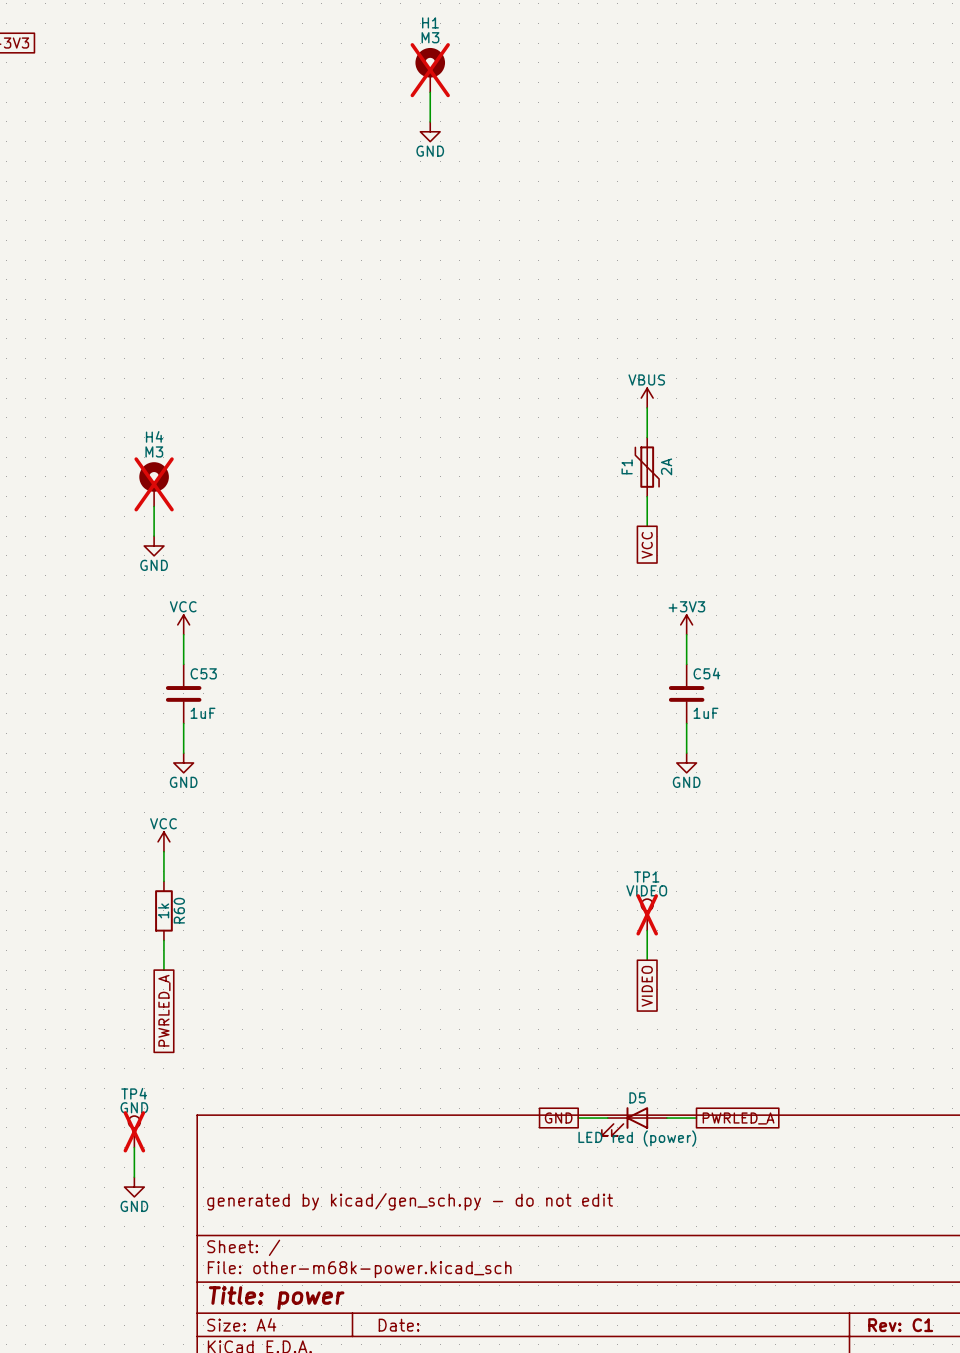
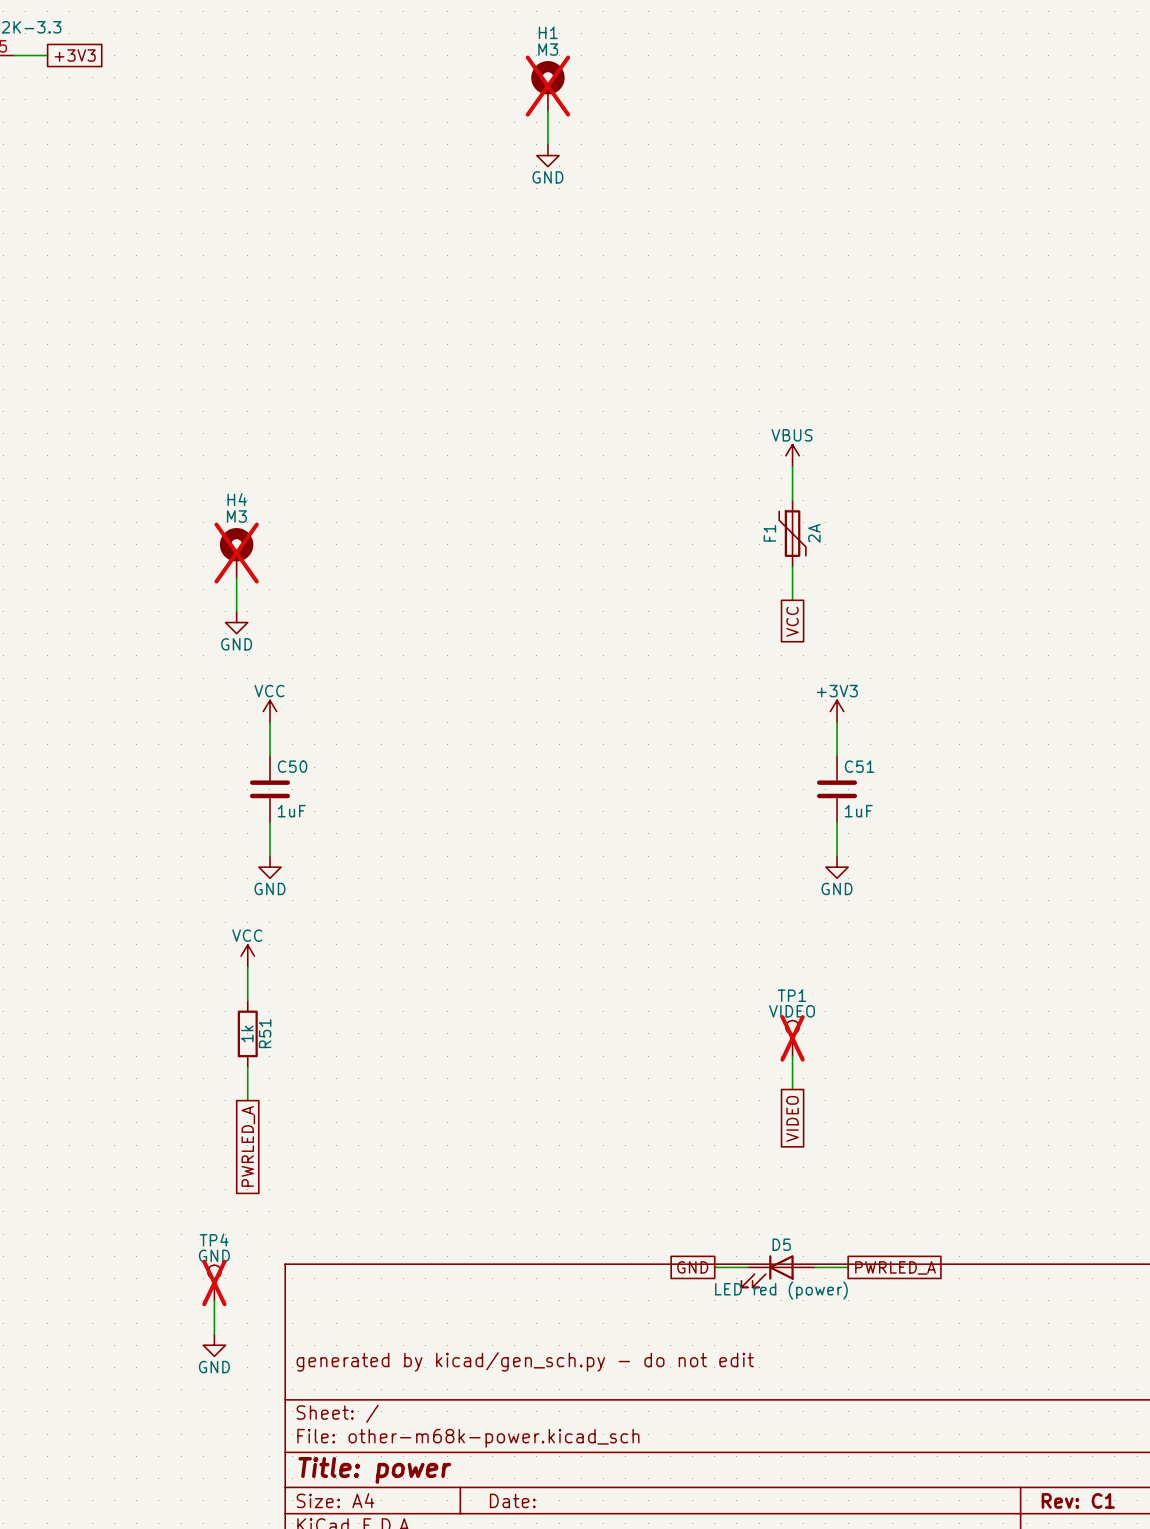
C53 name: C53 (203, 673) -> C50 (292, 766)
C54 name: C54 (706, 673) -> C51 (859, 766)
R60 name: R60 (179, 910) -> R51 (265, 1033)

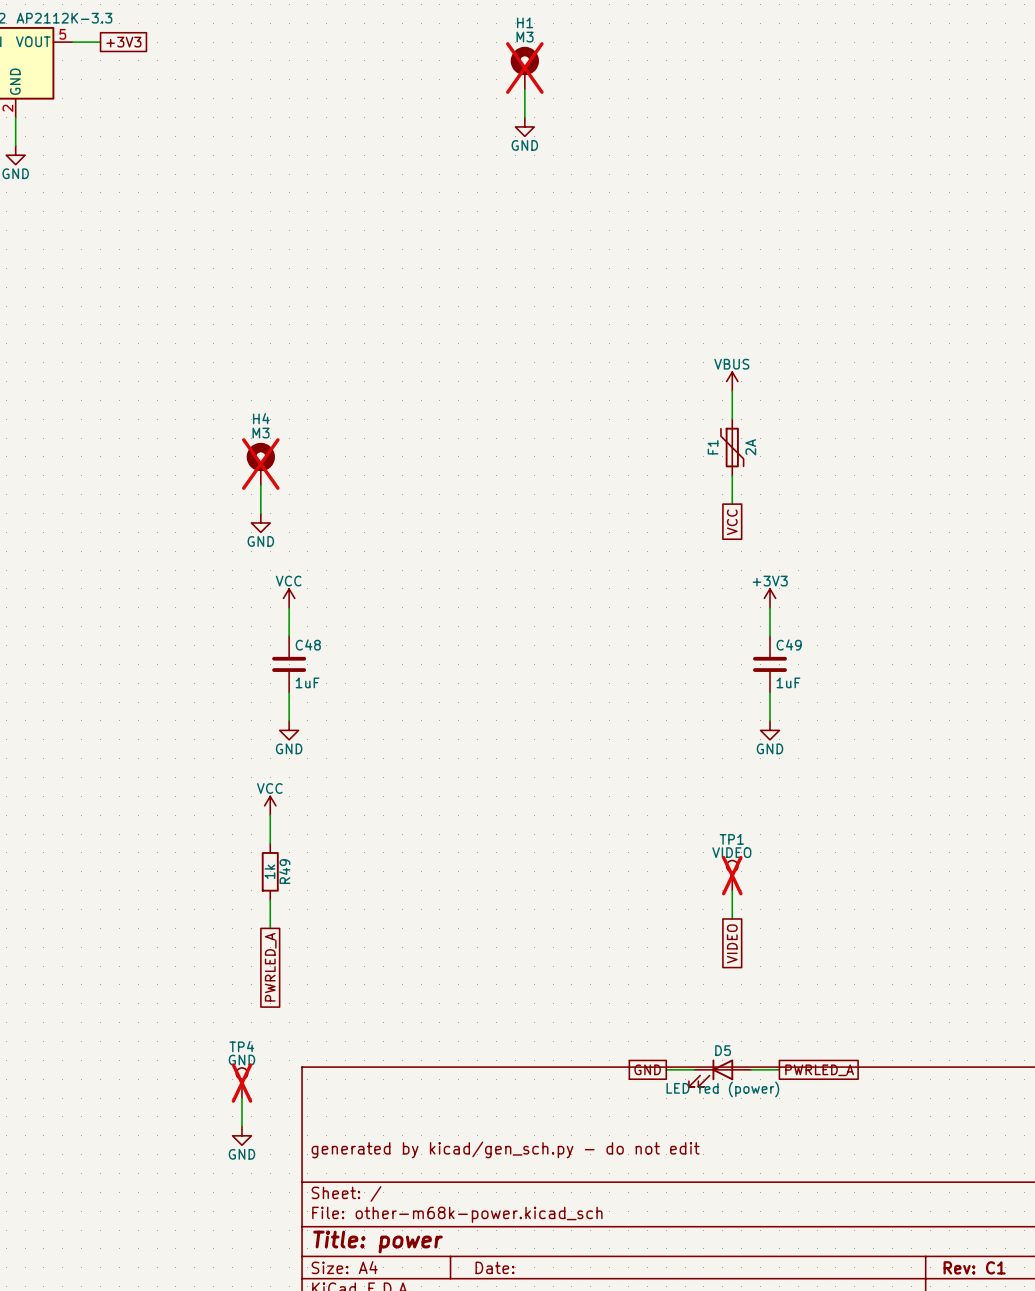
C50 name: C50 (292, 766) -> C48 (308, 644)
C51 name: C51 (859, 766) -> C49 (789, 644)
R51 name: R51 (265, 1033) -> R49 (284, 871)

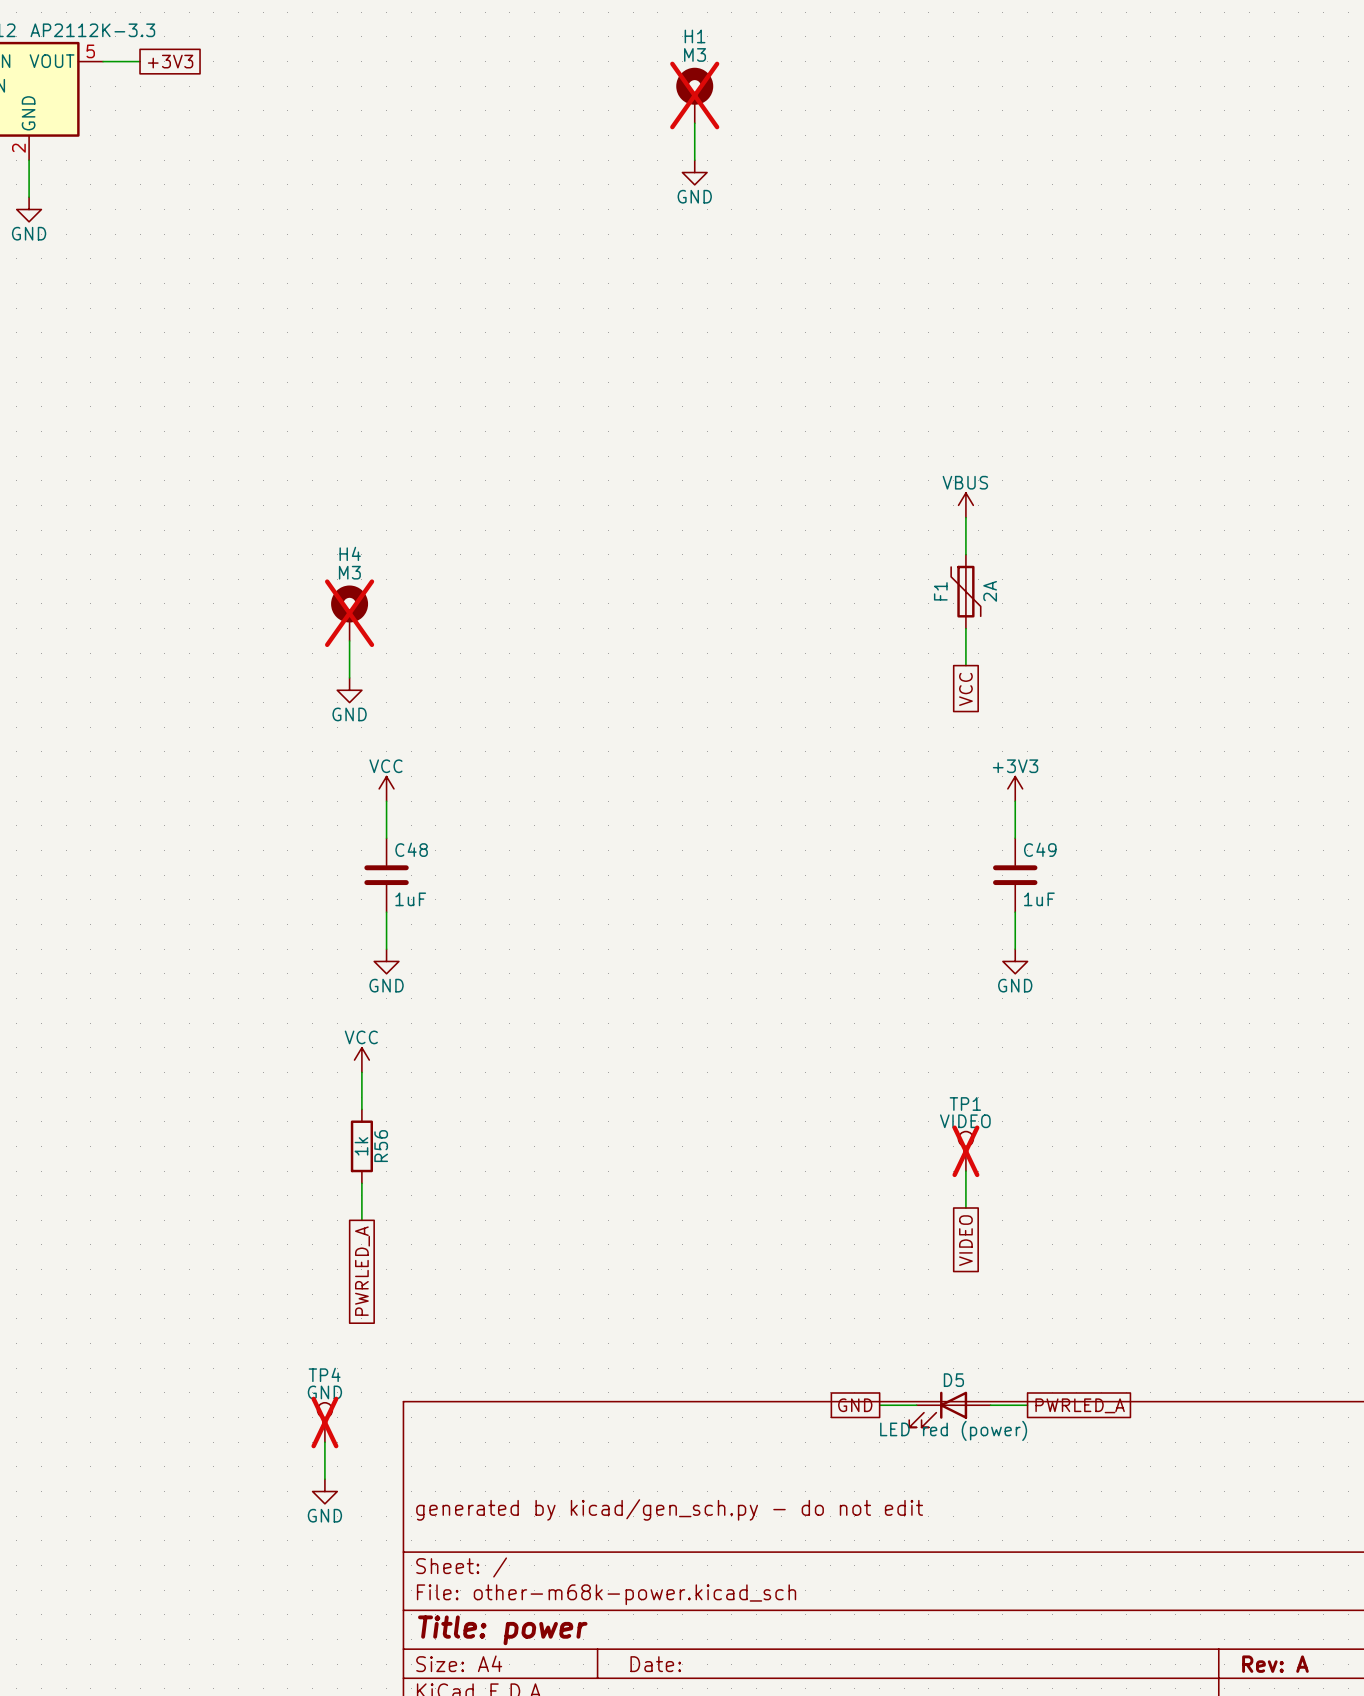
R49 name: R49 (284, 871) -> R56 (381, 1146)
title block: Rev: C1 (974, 1267) -> Rev: A (1275, 1664)

